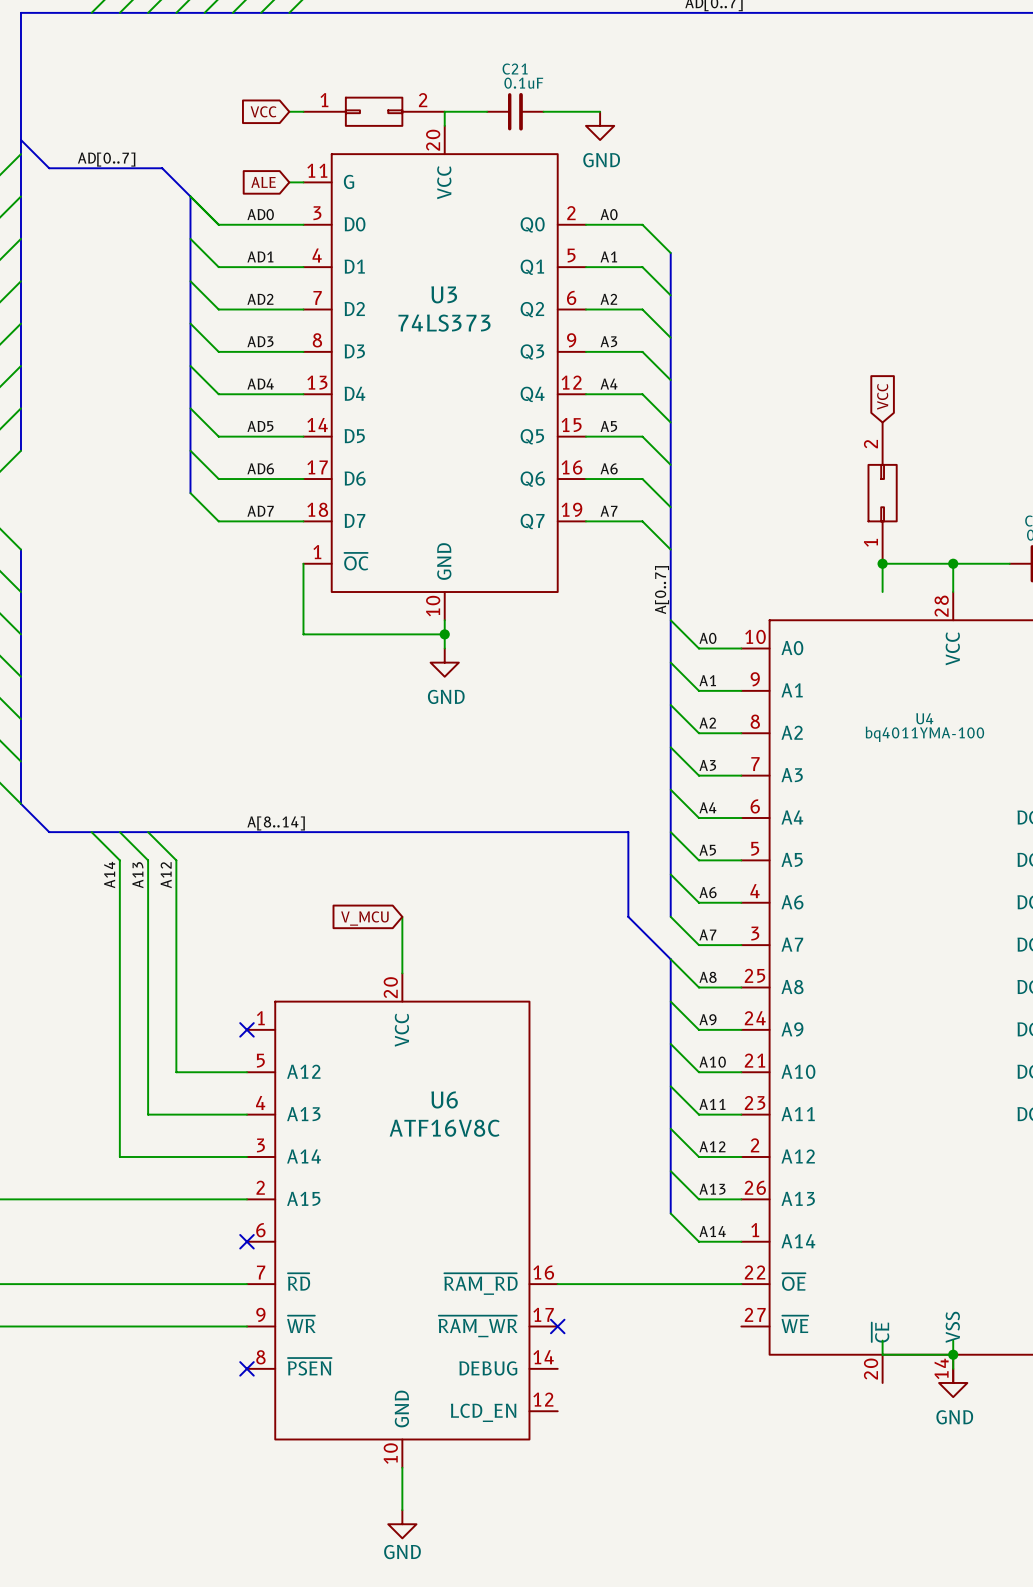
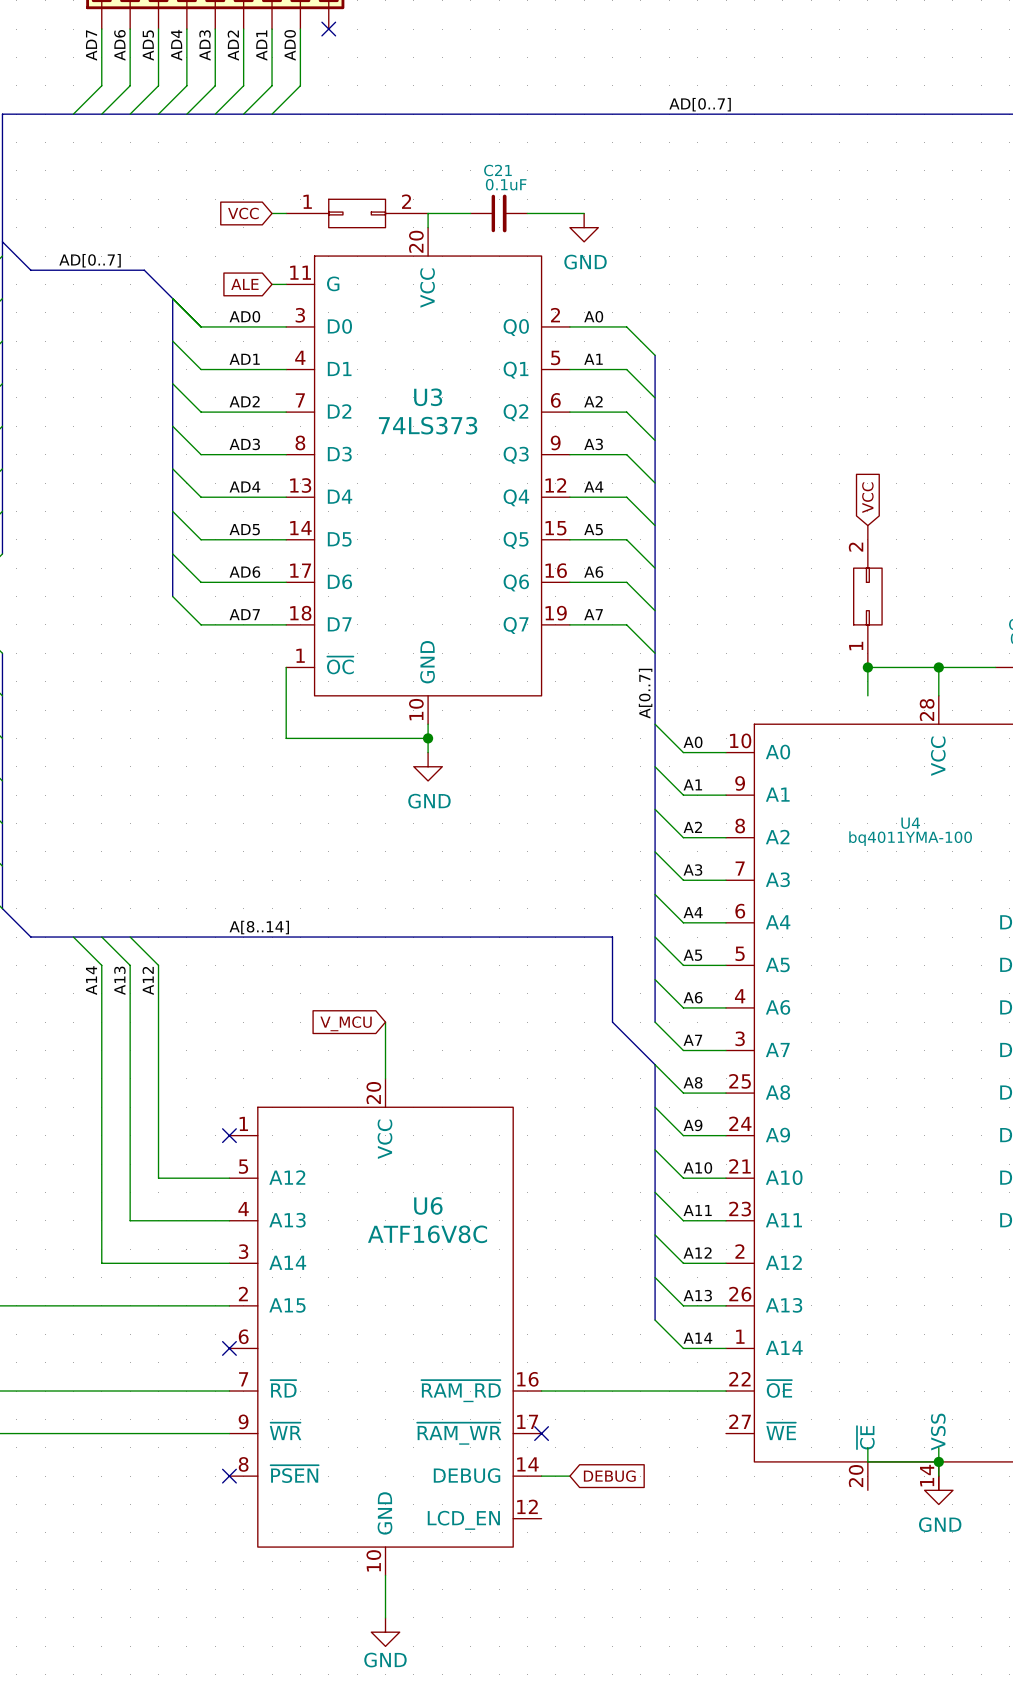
wire: none -> (541, 1476) (569, 1476)
global label: none -> DEBUG (609, 1476)

